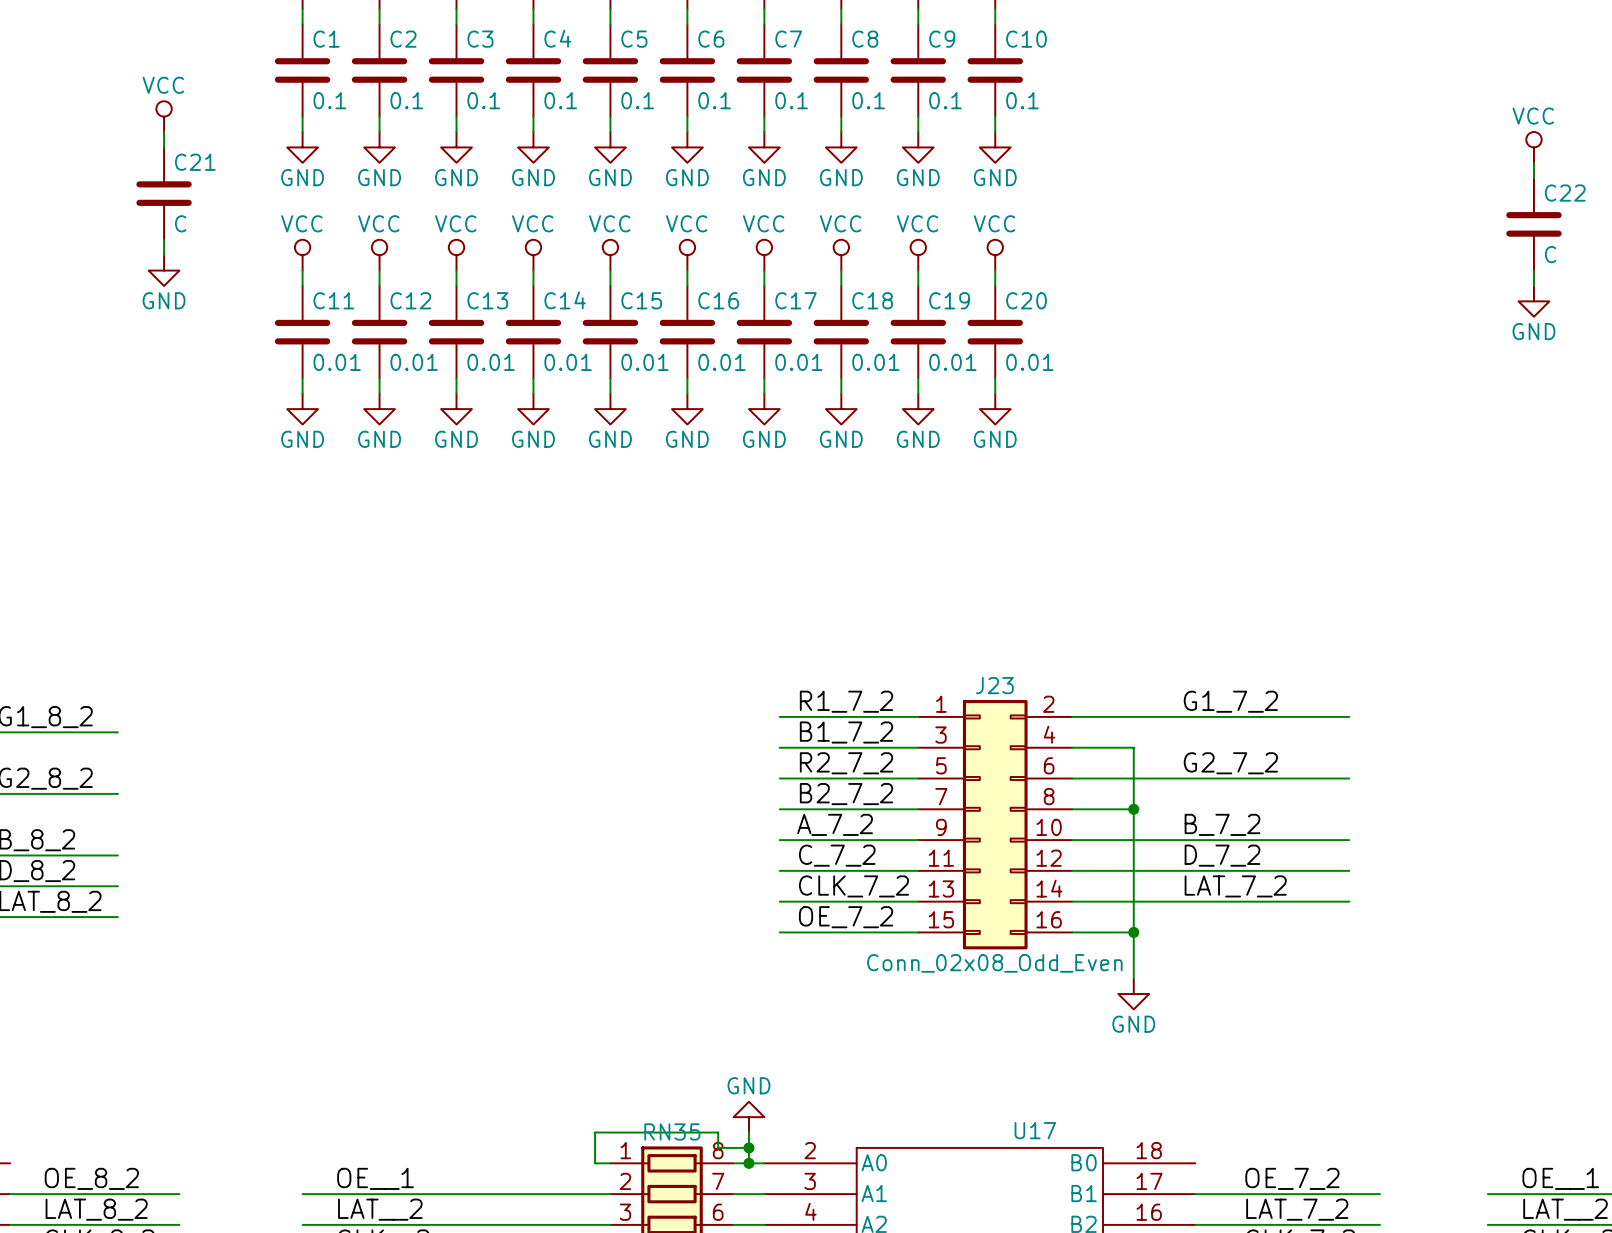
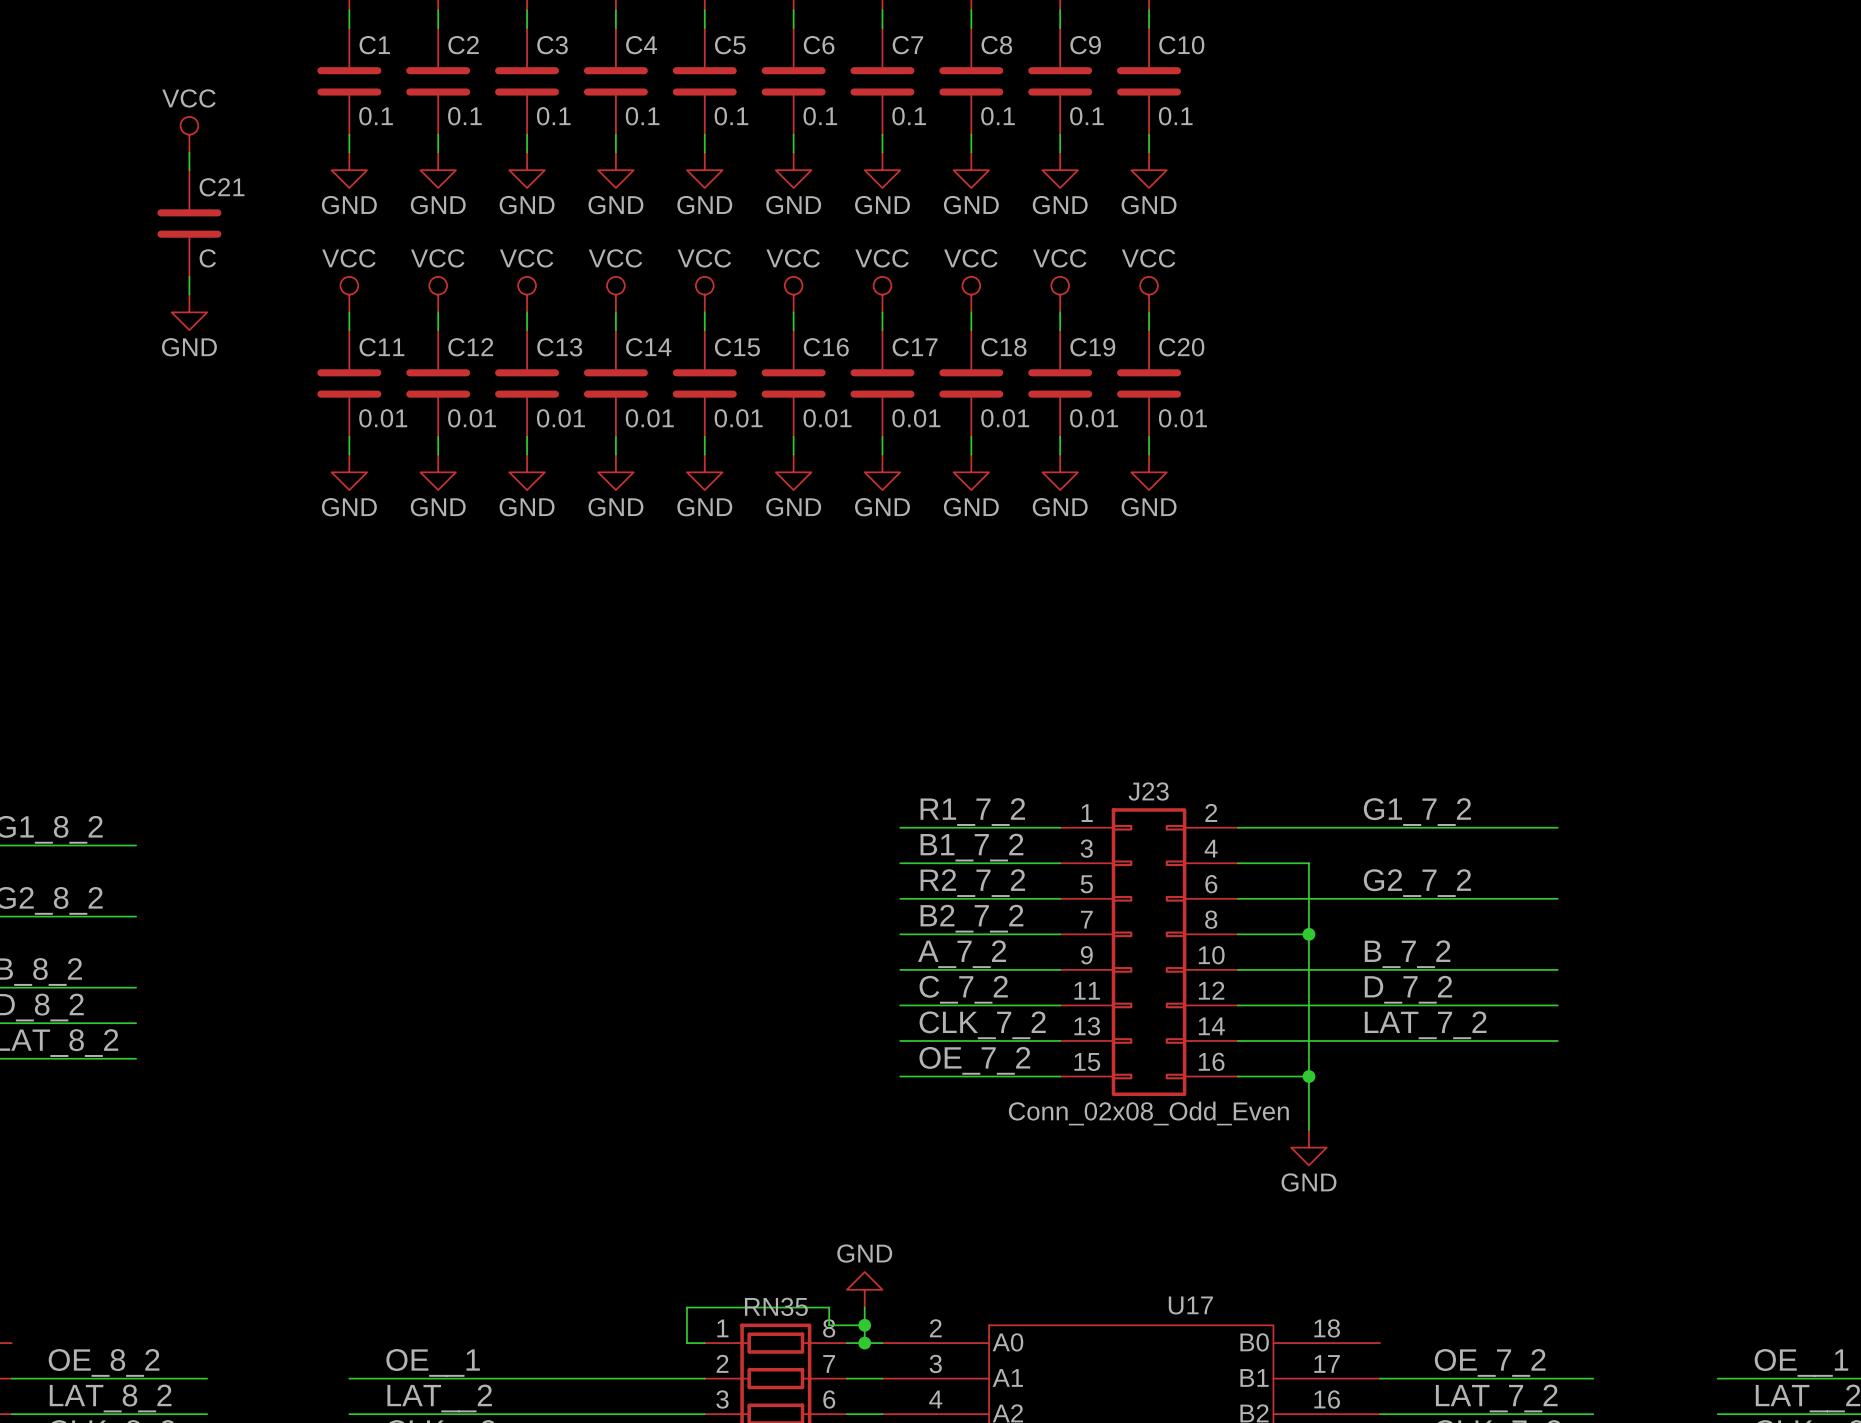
power symbol: VCC (1533, 147) -> none
wire: (1533, 162) (1533, 178) -> none
C22: C (1533, 224) -> none
wire: (1533, 270) (1533, 285) -> none
power symbol: GND (1533, 301) -> none

